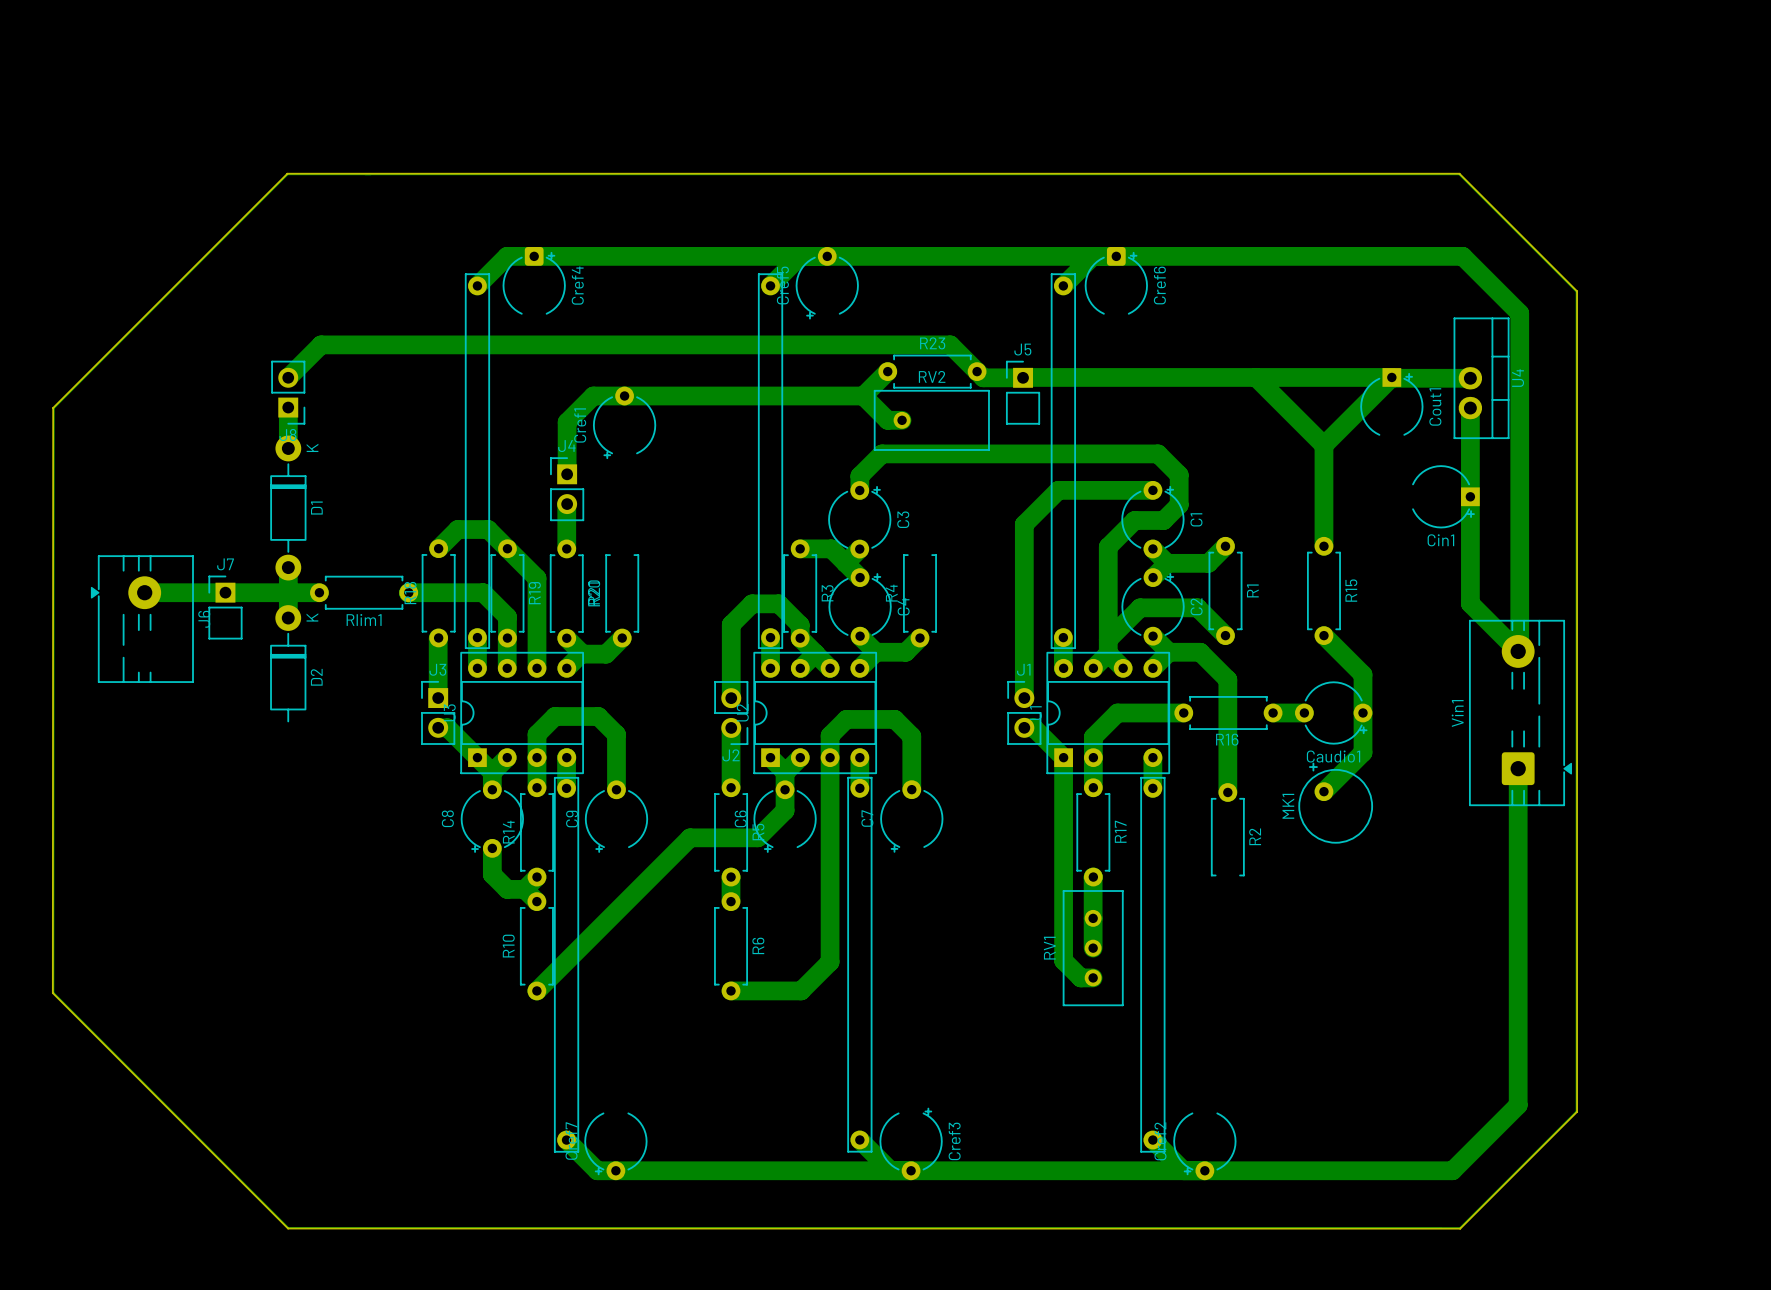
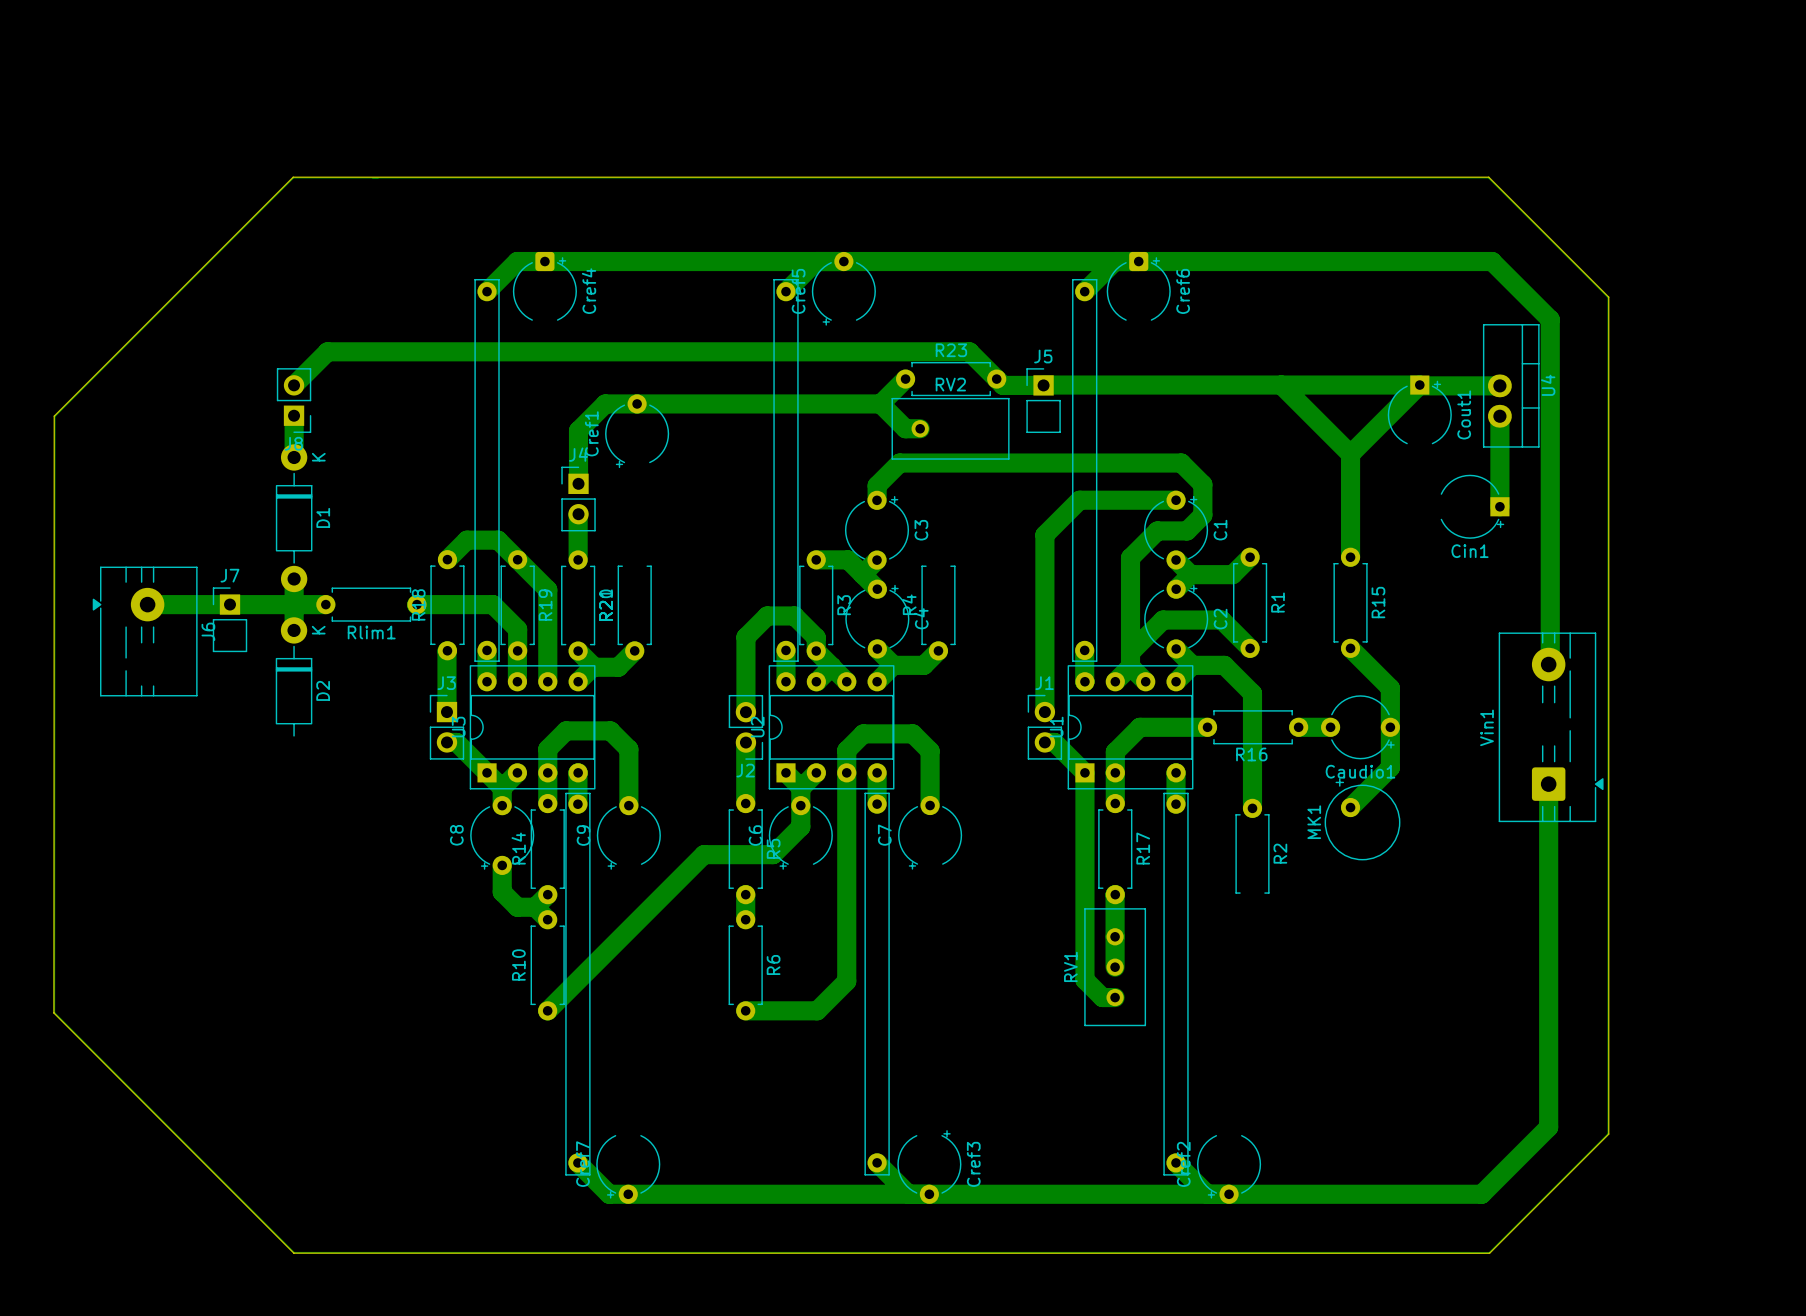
bottom track: (1470, 496) (1470, 603) (1518, 651) -> none

